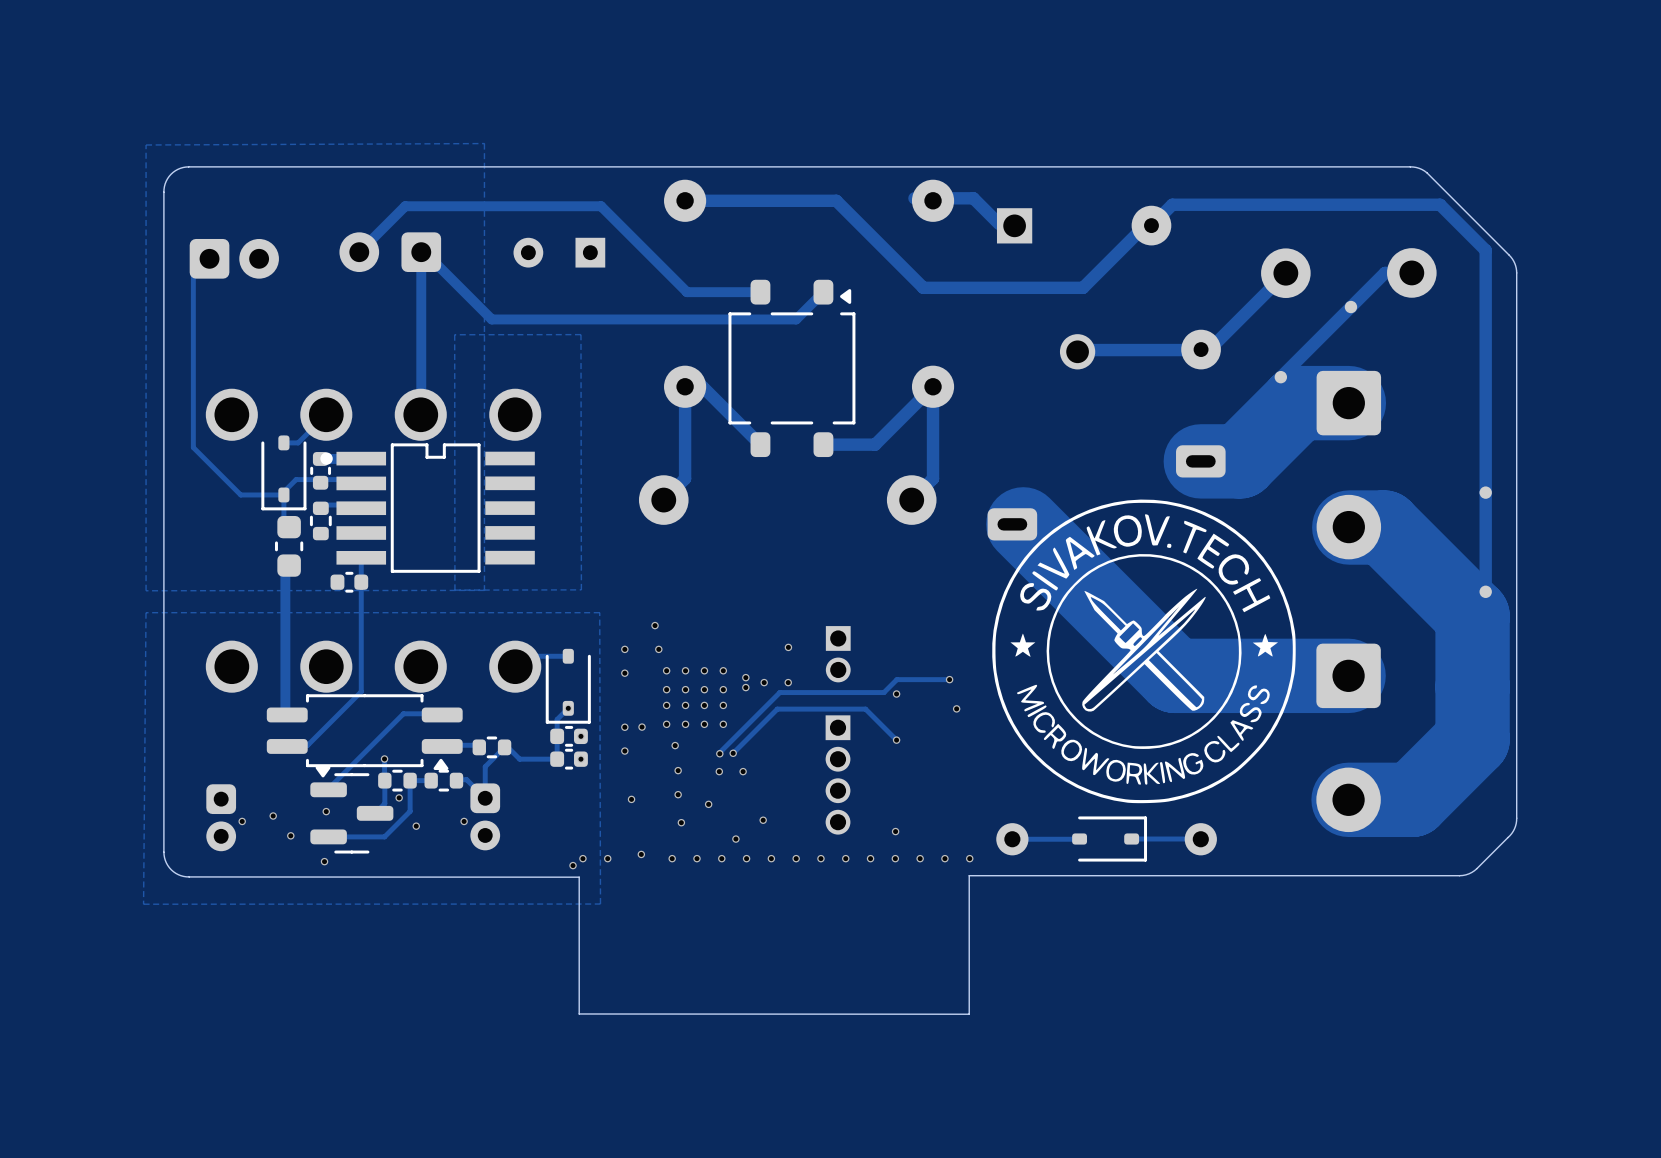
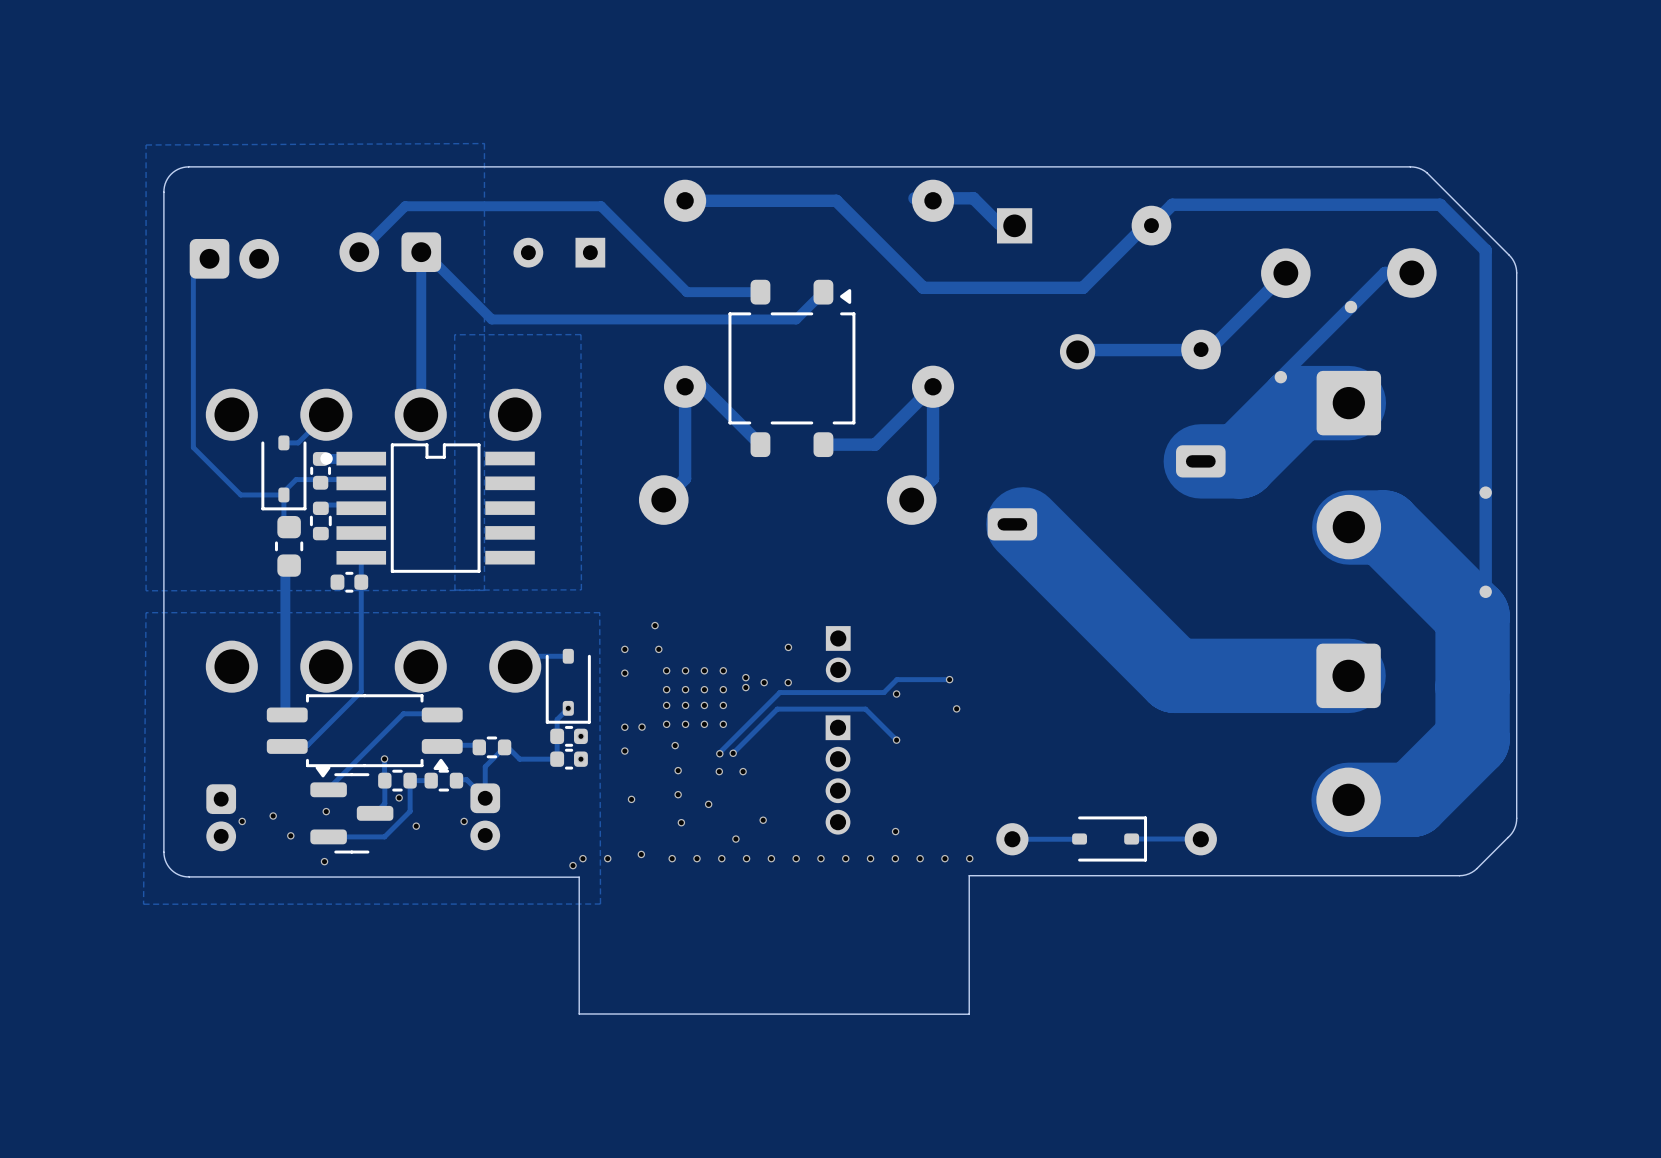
drawing: [992, 499, 1296, 804] -> none

